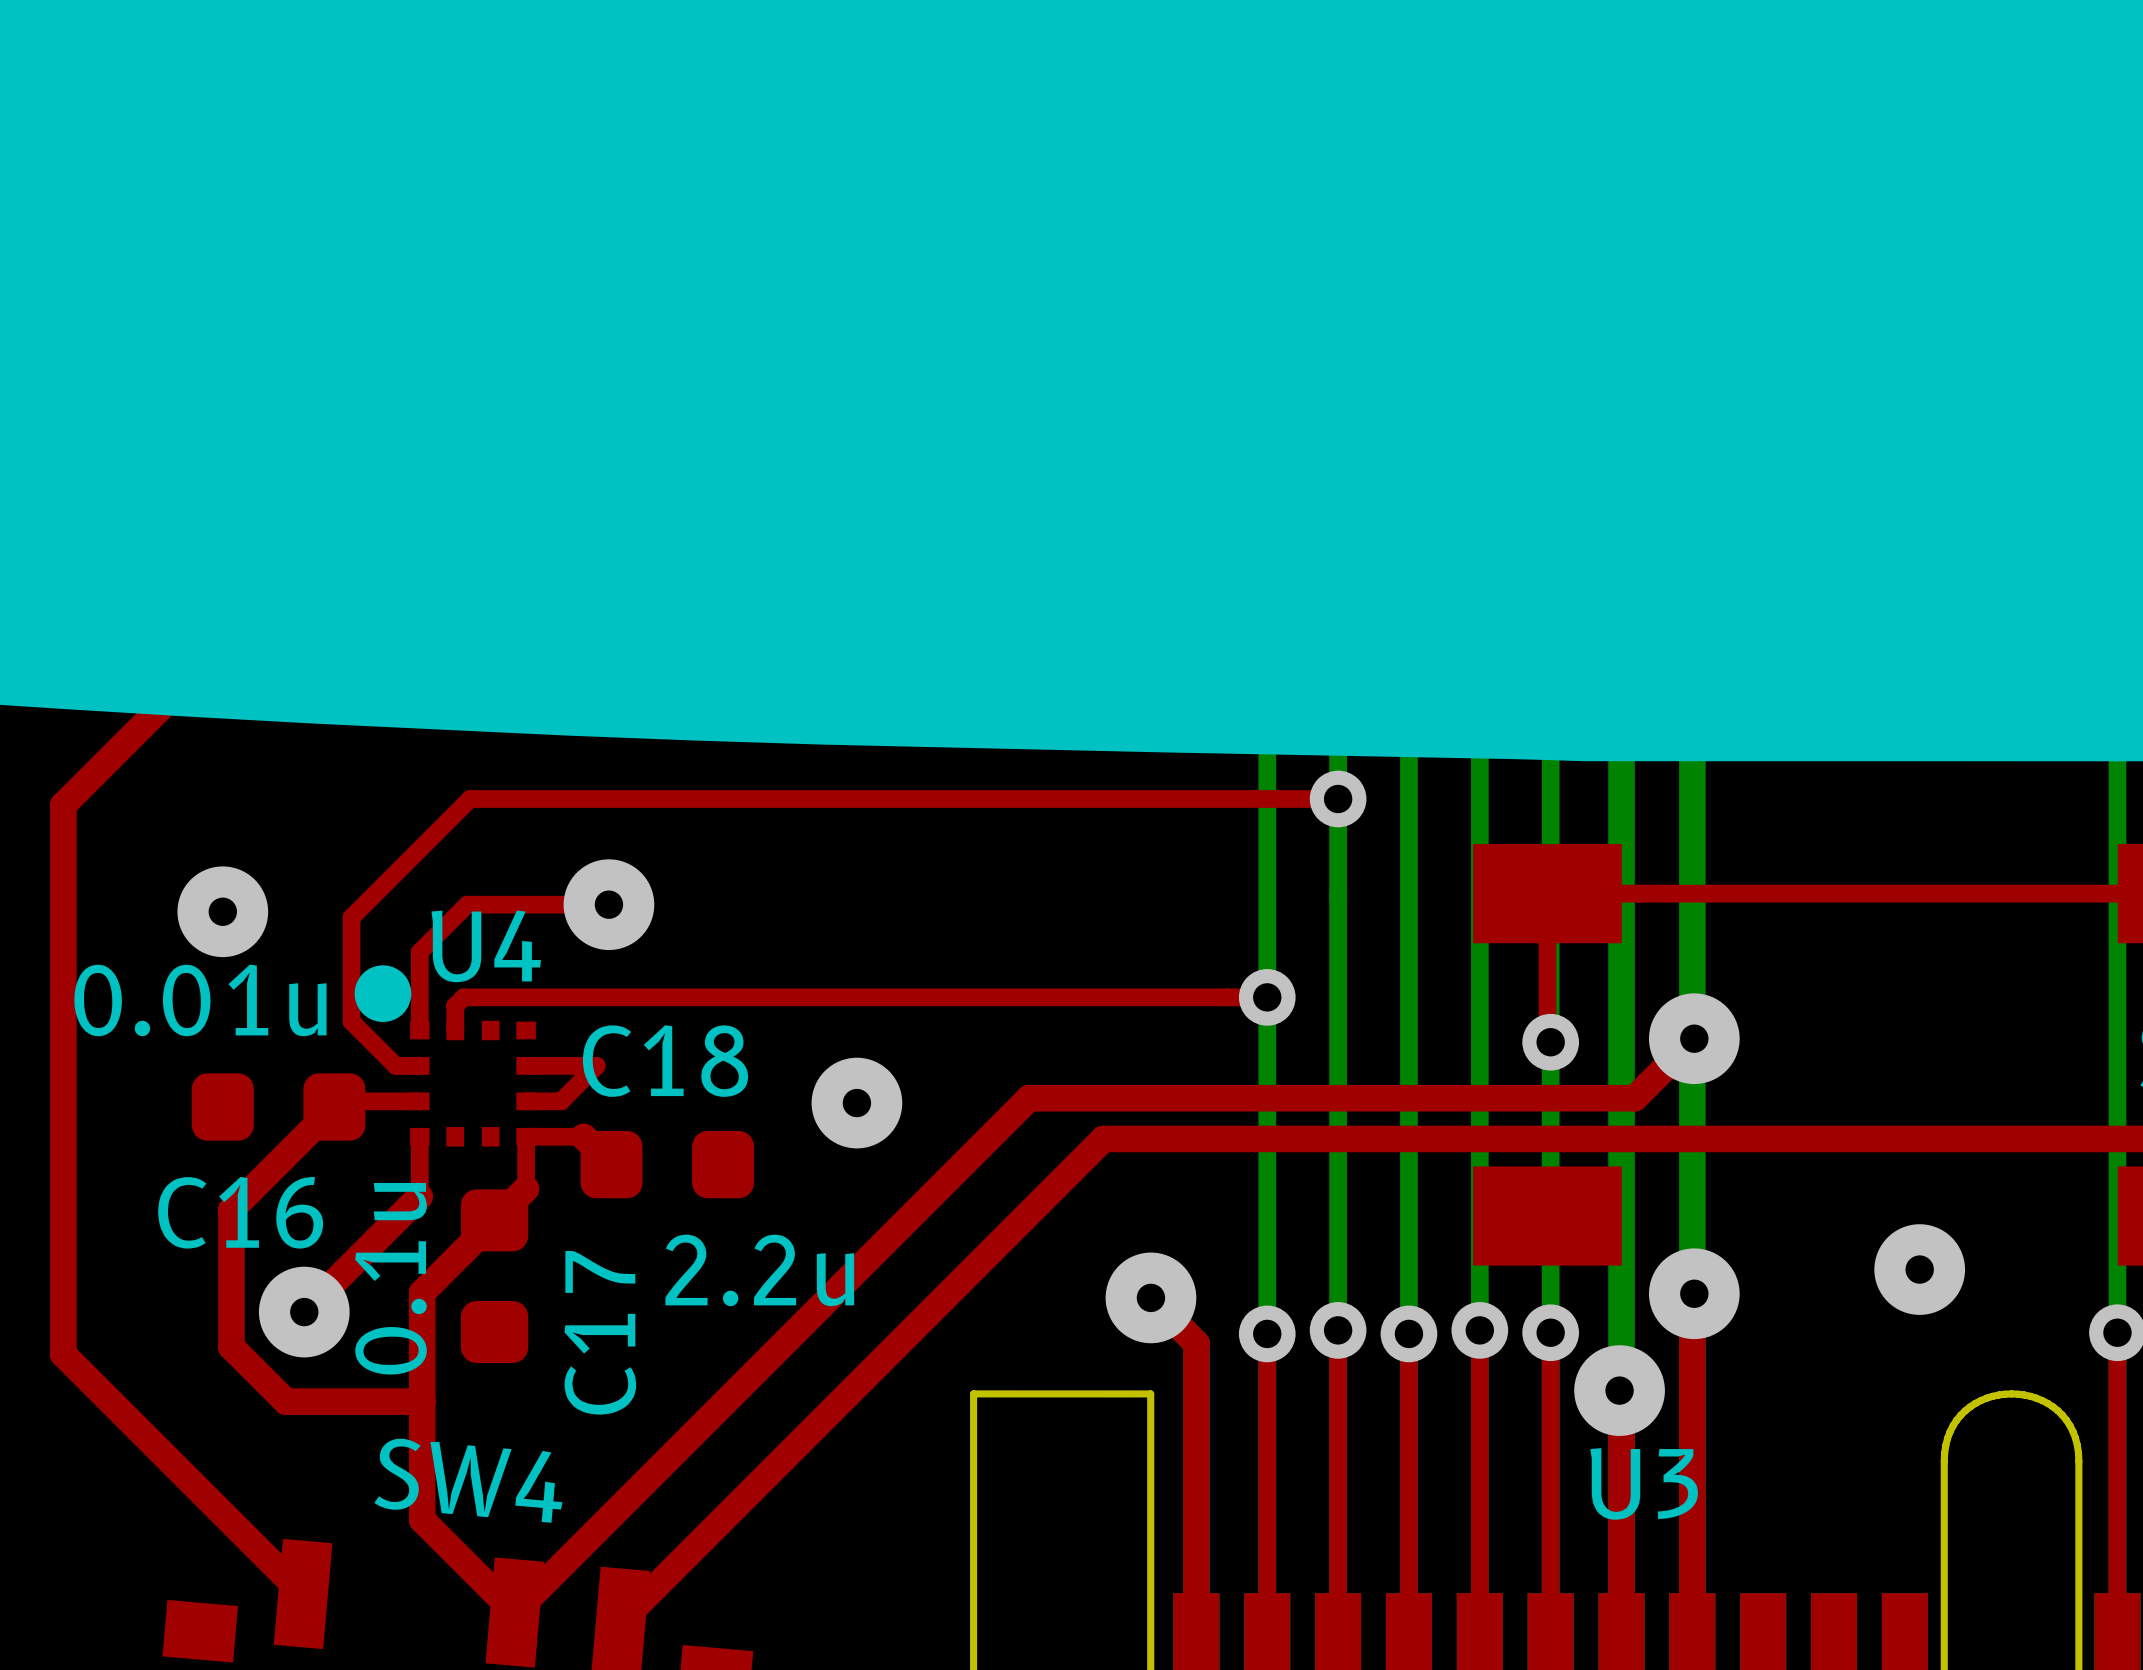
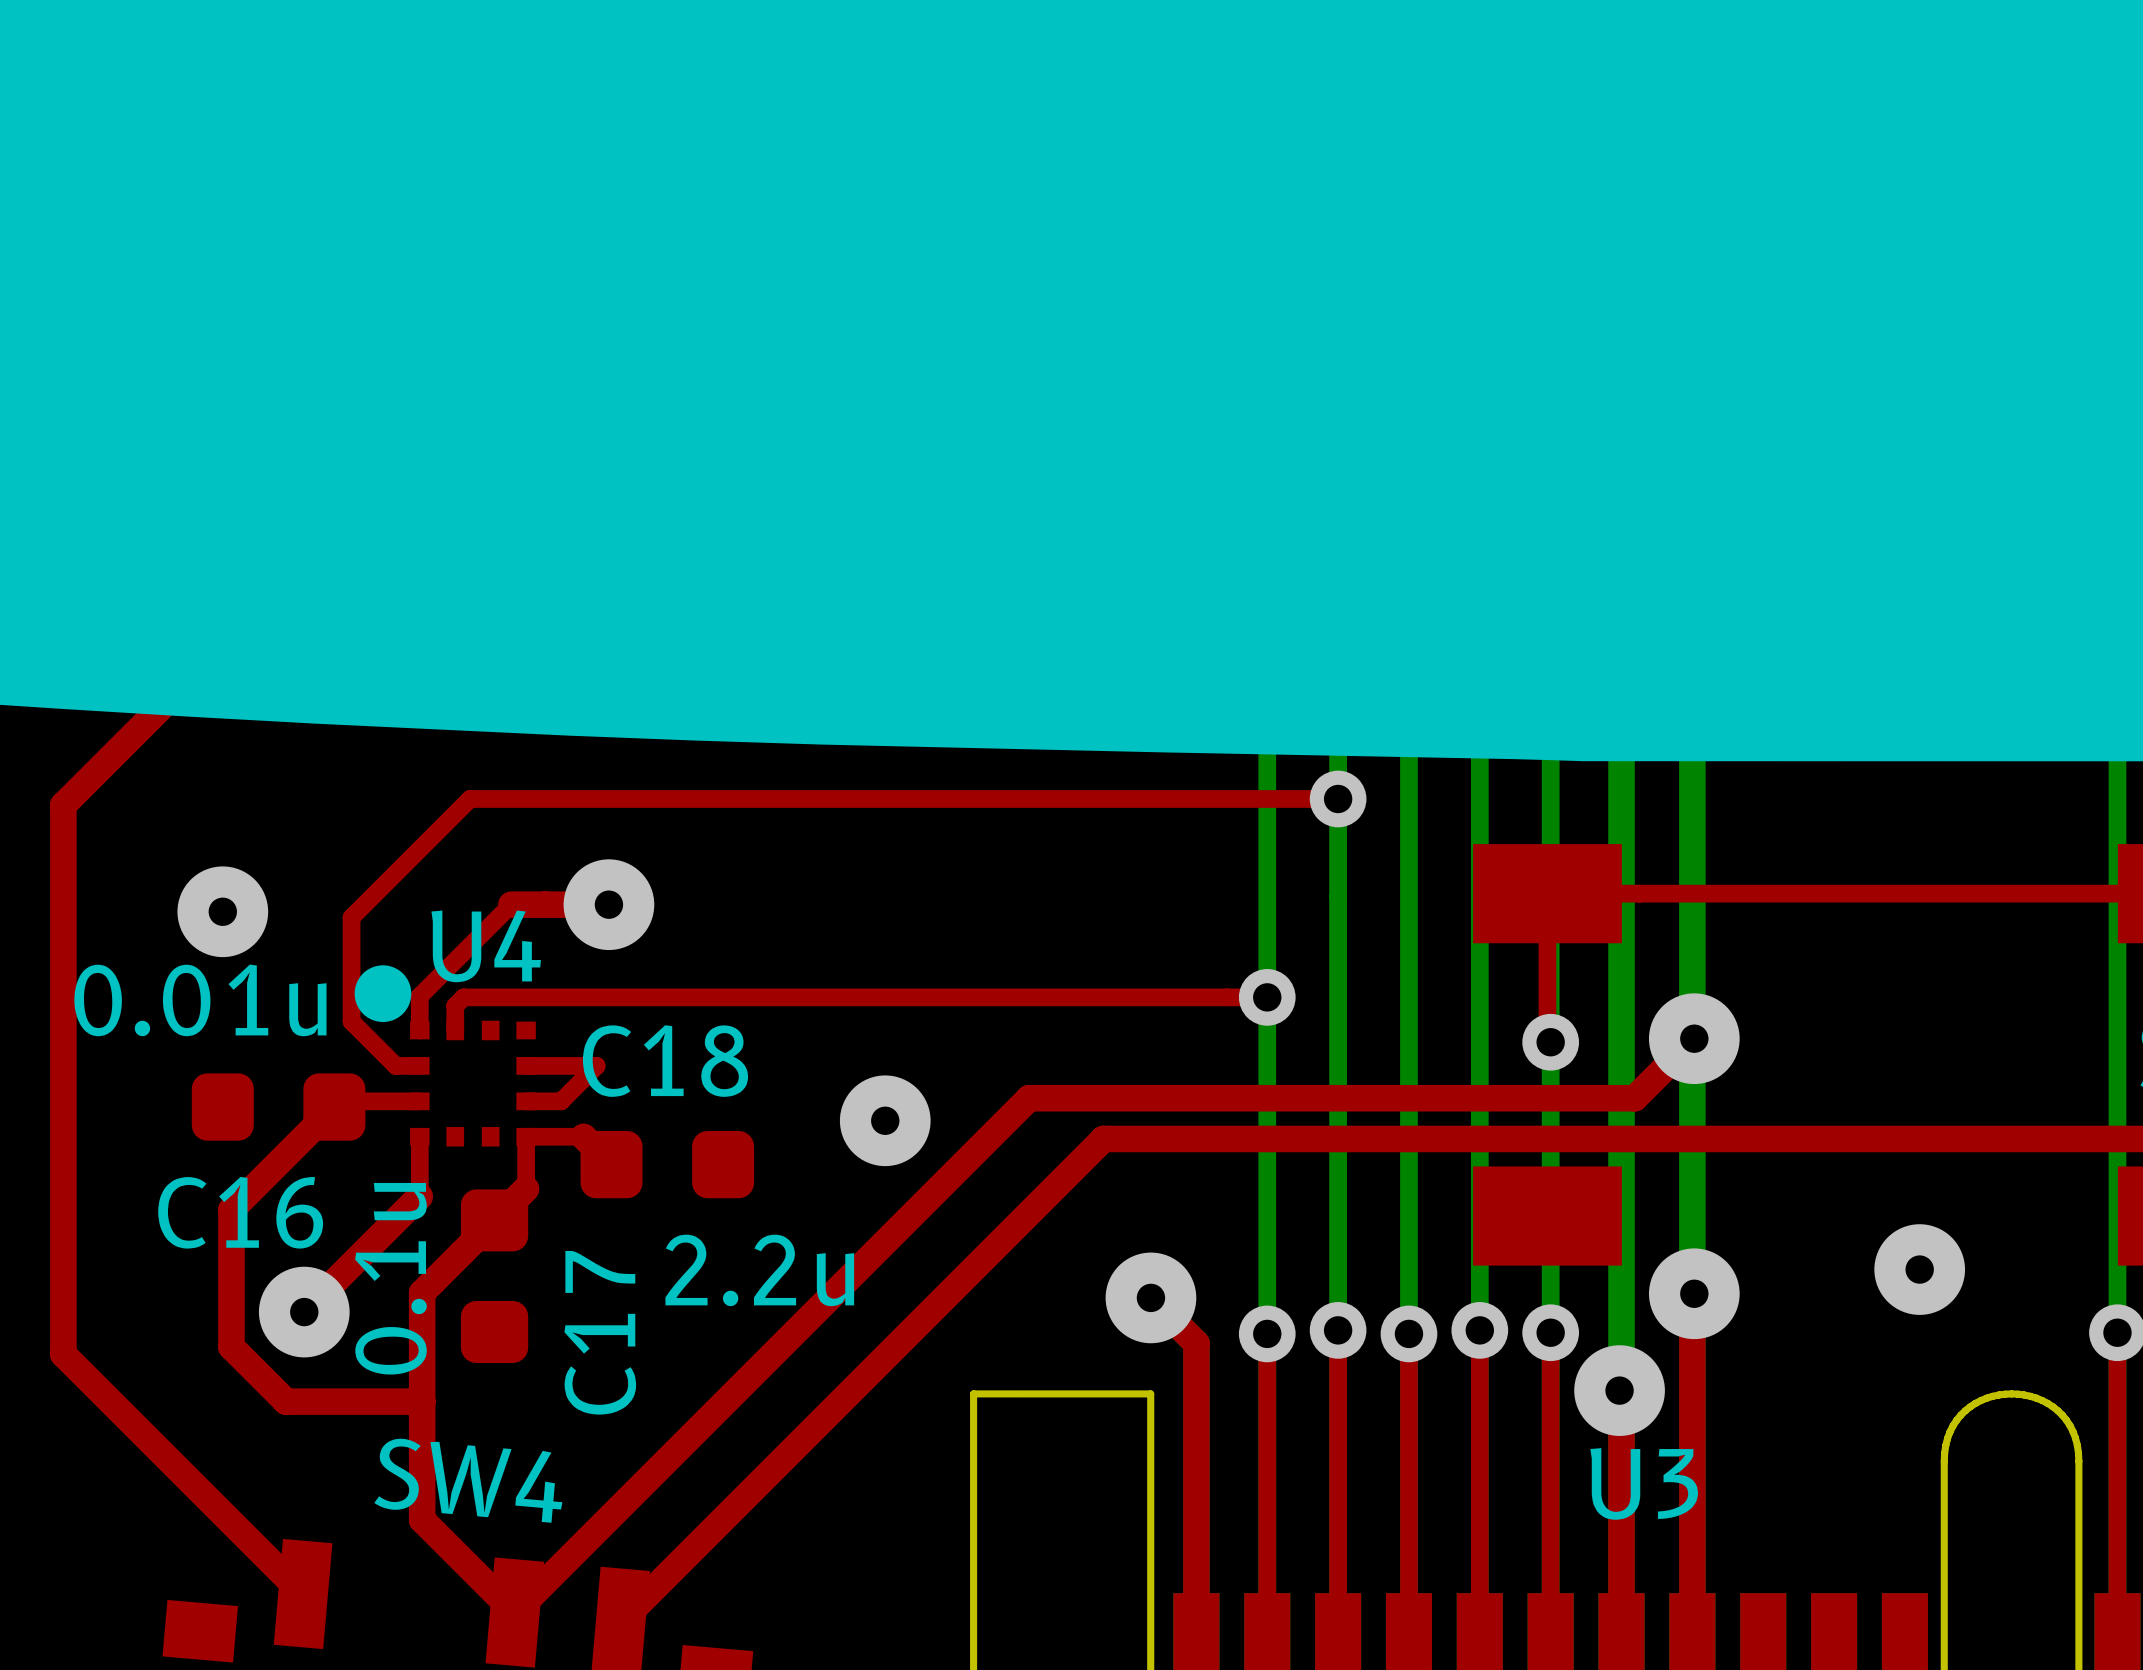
top track: (511, 904) (467, 904) (419, 952) (419, 996) -> (511, 904) (419, 996)
top track width: thin (511, 904) (608, 904) -> thick (511, 904) (608, 904)
via position: (856, 1103) -> (885, 1120)

